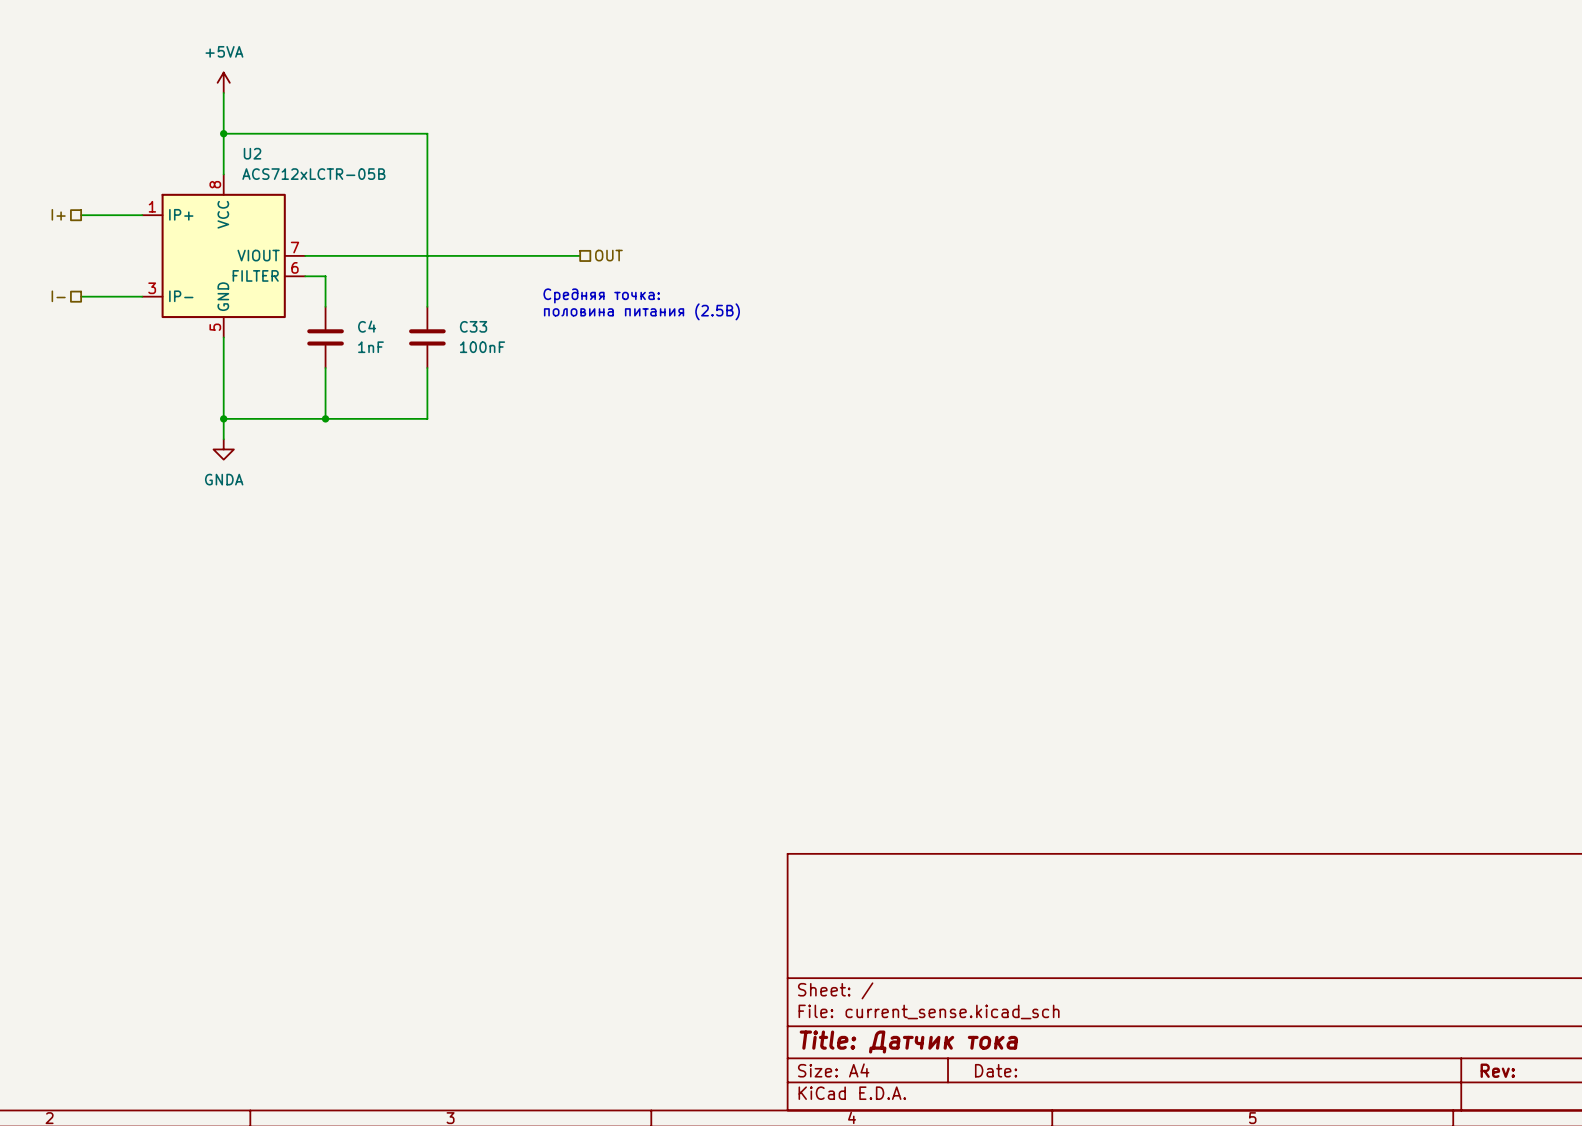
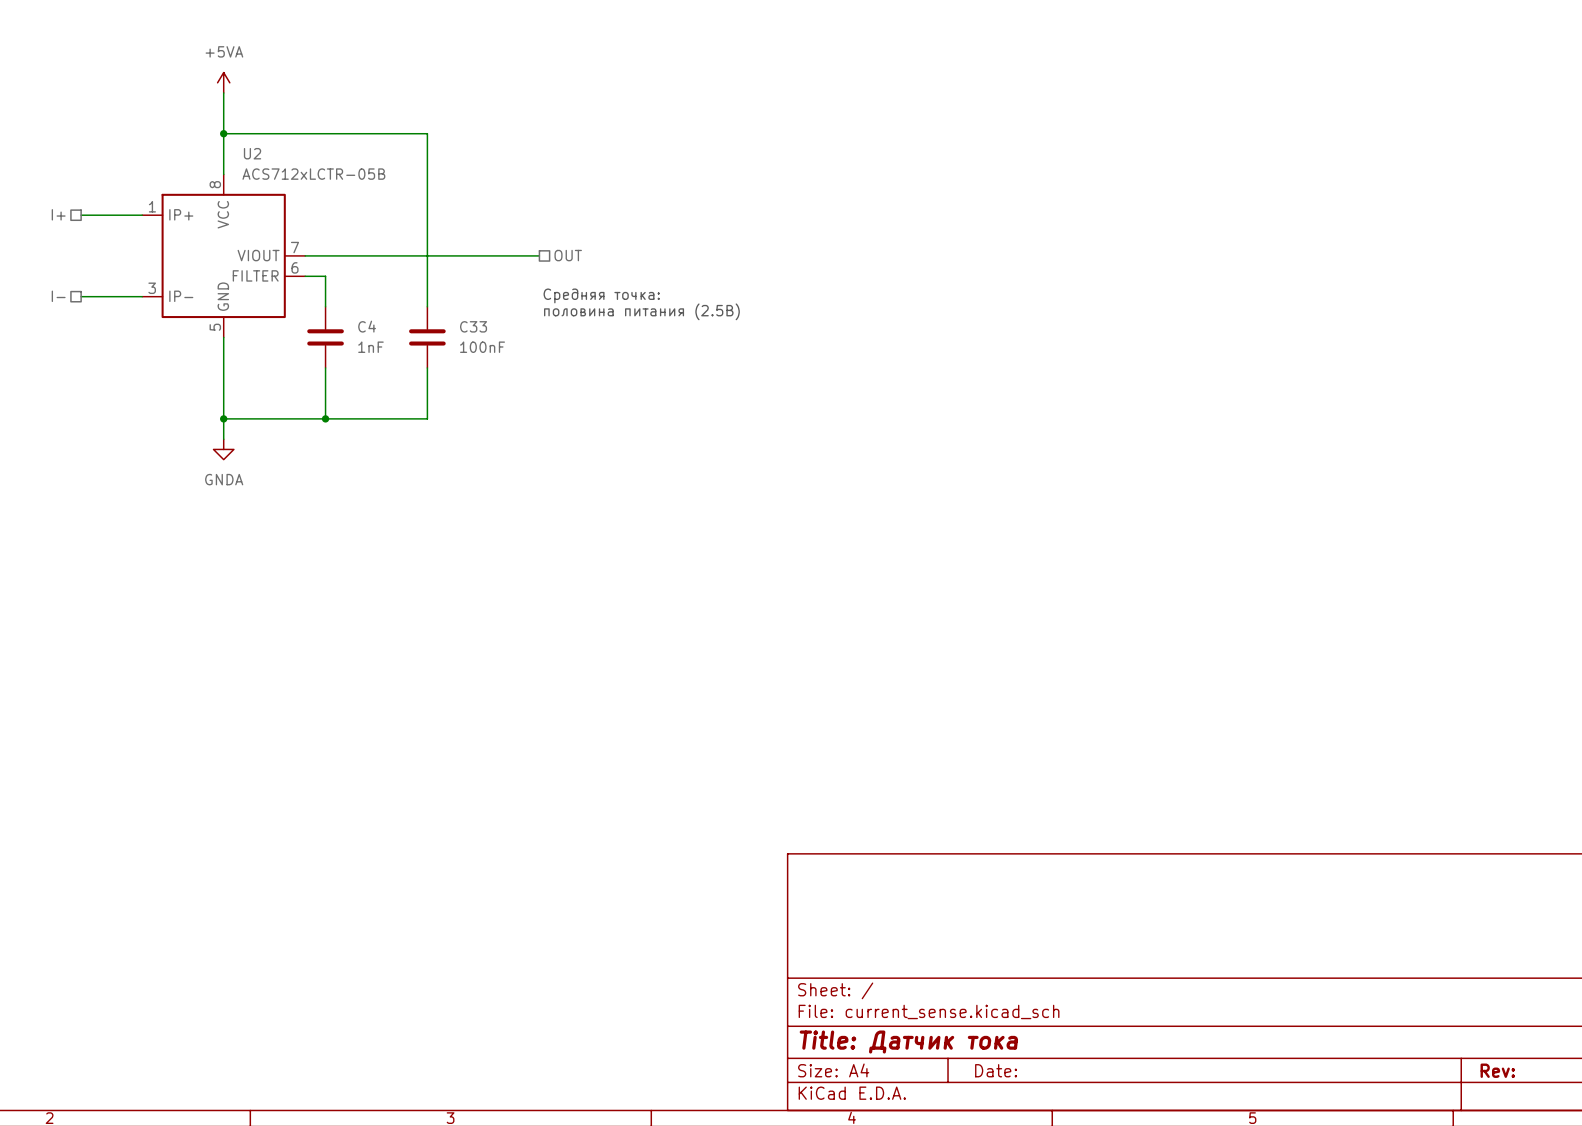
wire: (539, 255) (580, 255) -> none
hierarchical label position: OUT (608, 255) -> OUT (568, 255)

